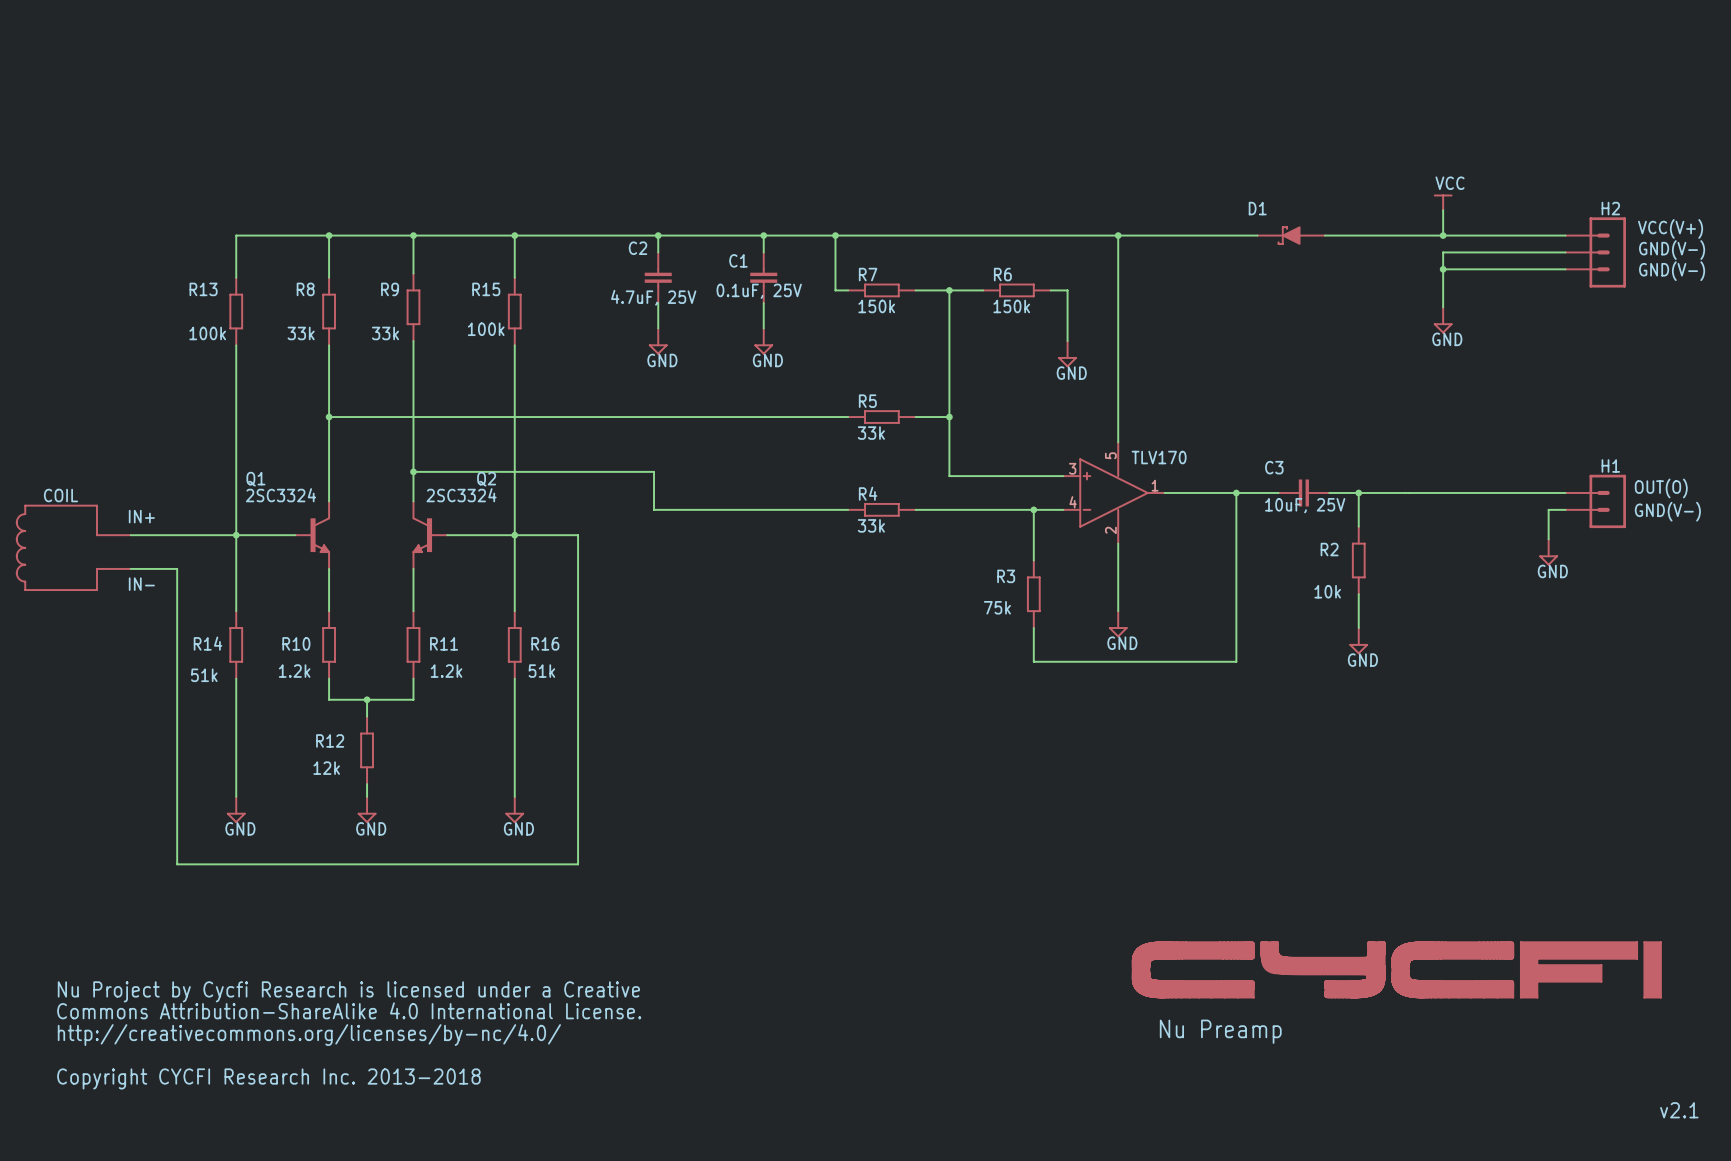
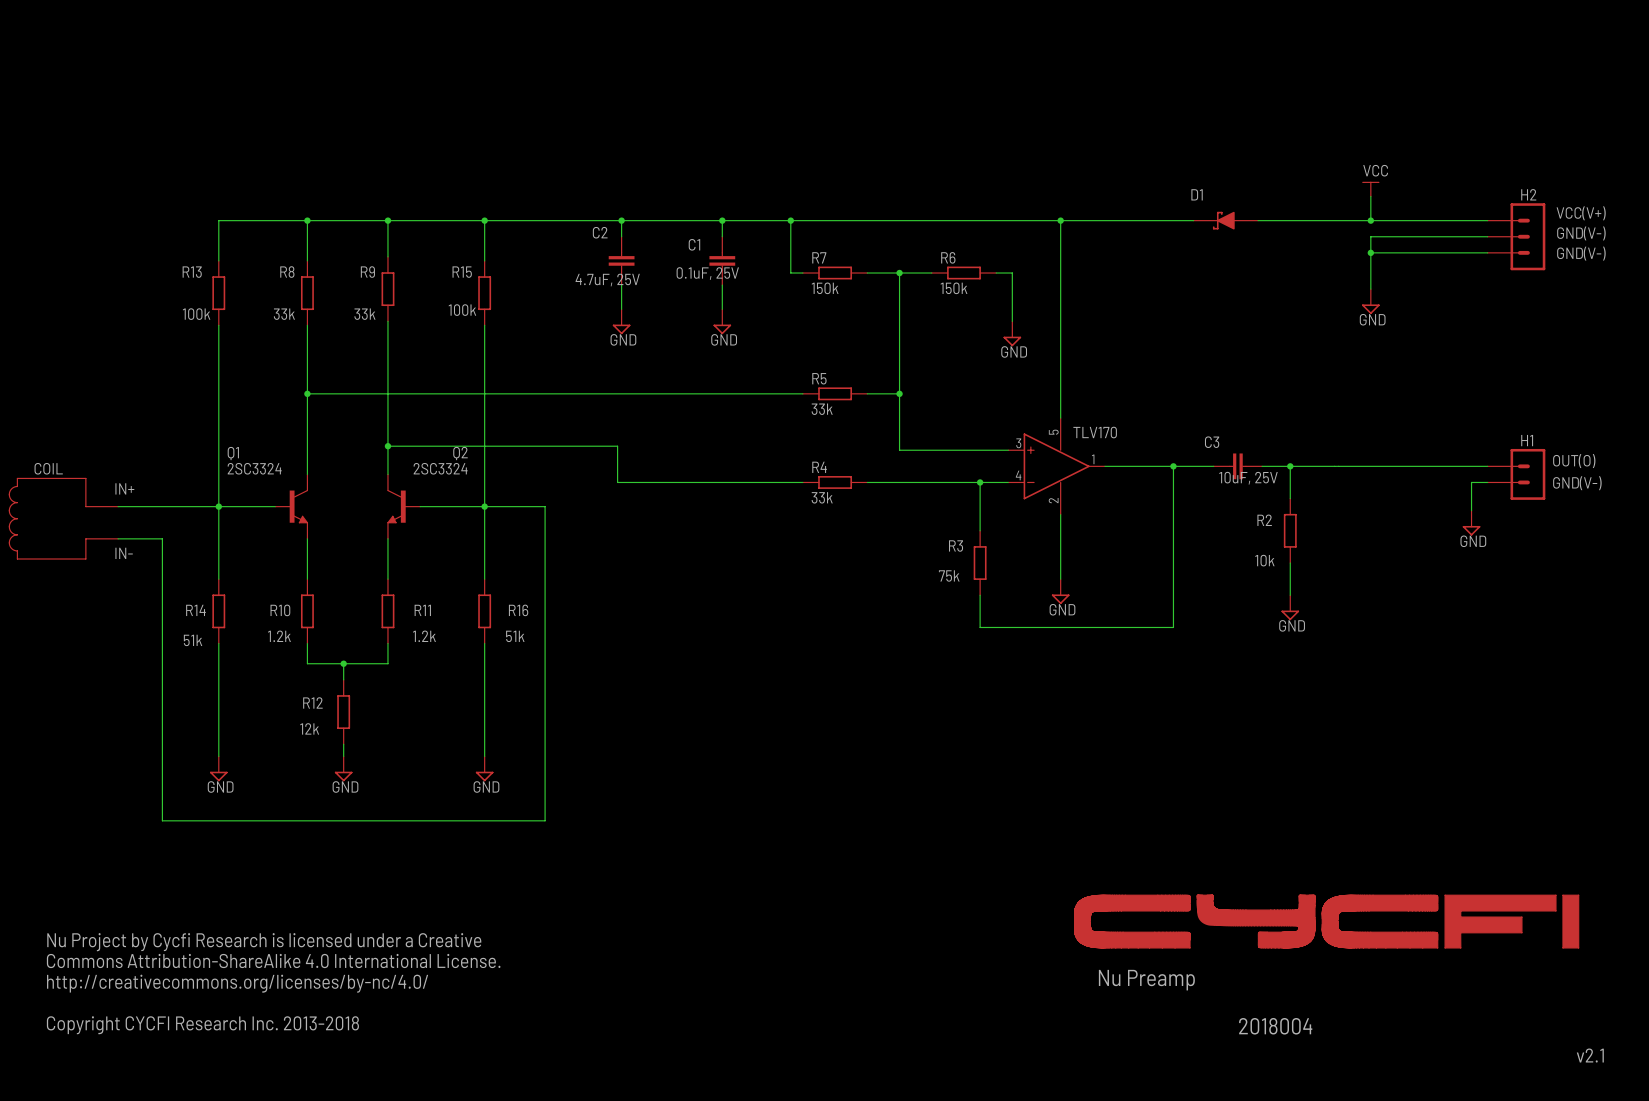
text: none -> 2018004 (1275, 1026)

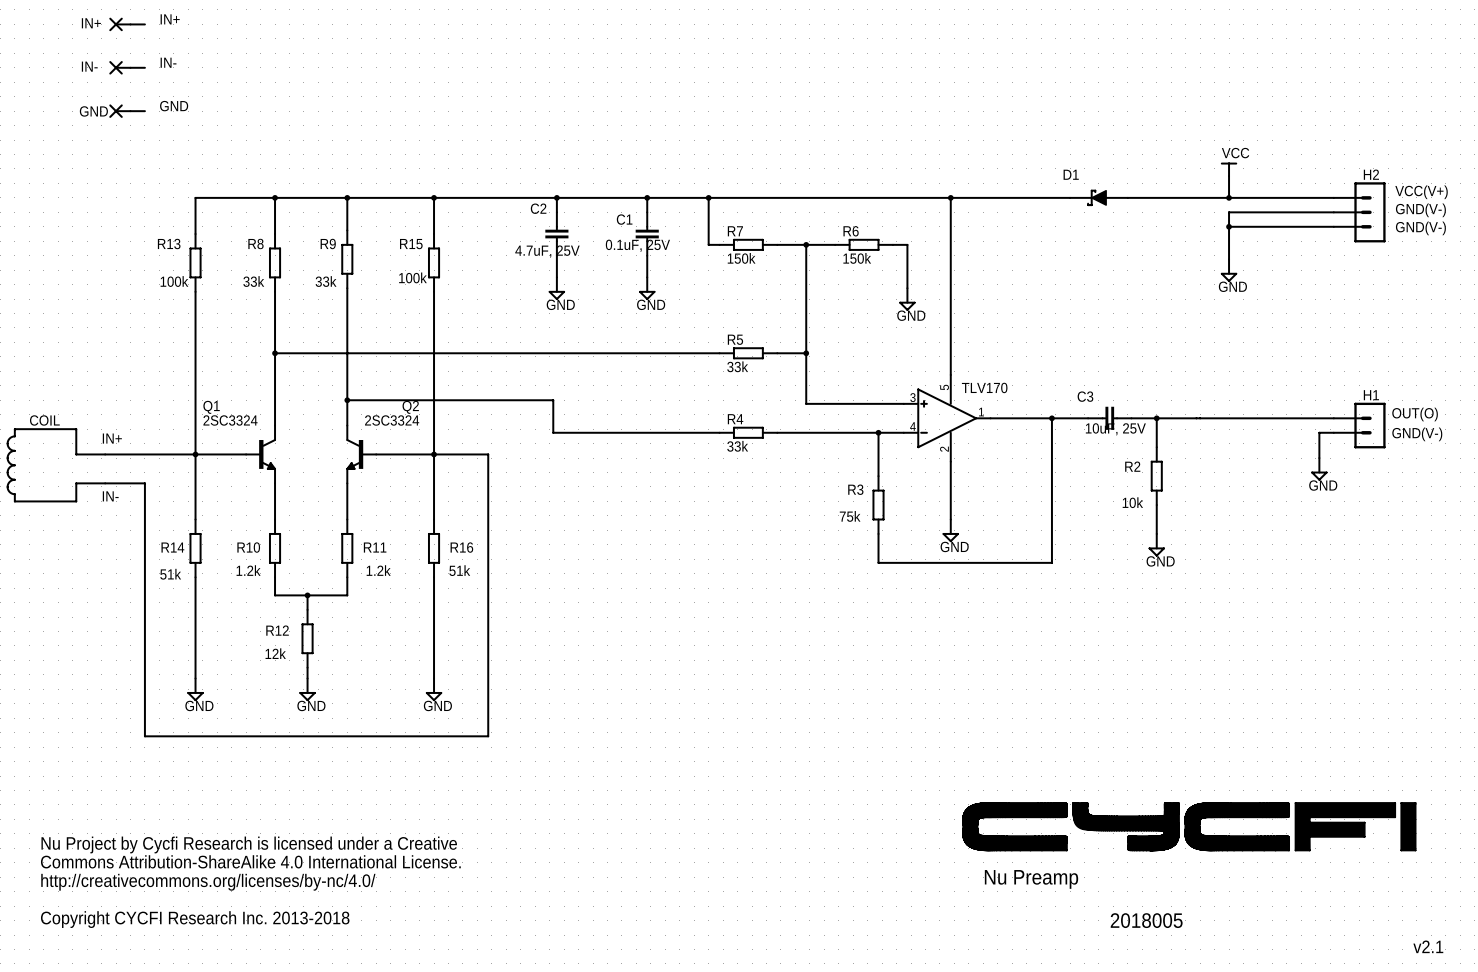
label: none -> IN+ (170, 19)
IN+: none -> (120, 24)
wire: none -> (130, 24) (144, 24)
label: none -> IN- (168, 62)
IN-: none -> (120, 67)
wire: none -> (130, 67) (144, 67)
label: none -> GND (174, 106)
GND: none -> (120, 111)
wire: none -> (130, 111) (144, 111)
text: 2018004 (1275, 1026) -> 2018005 (1146, 920)

